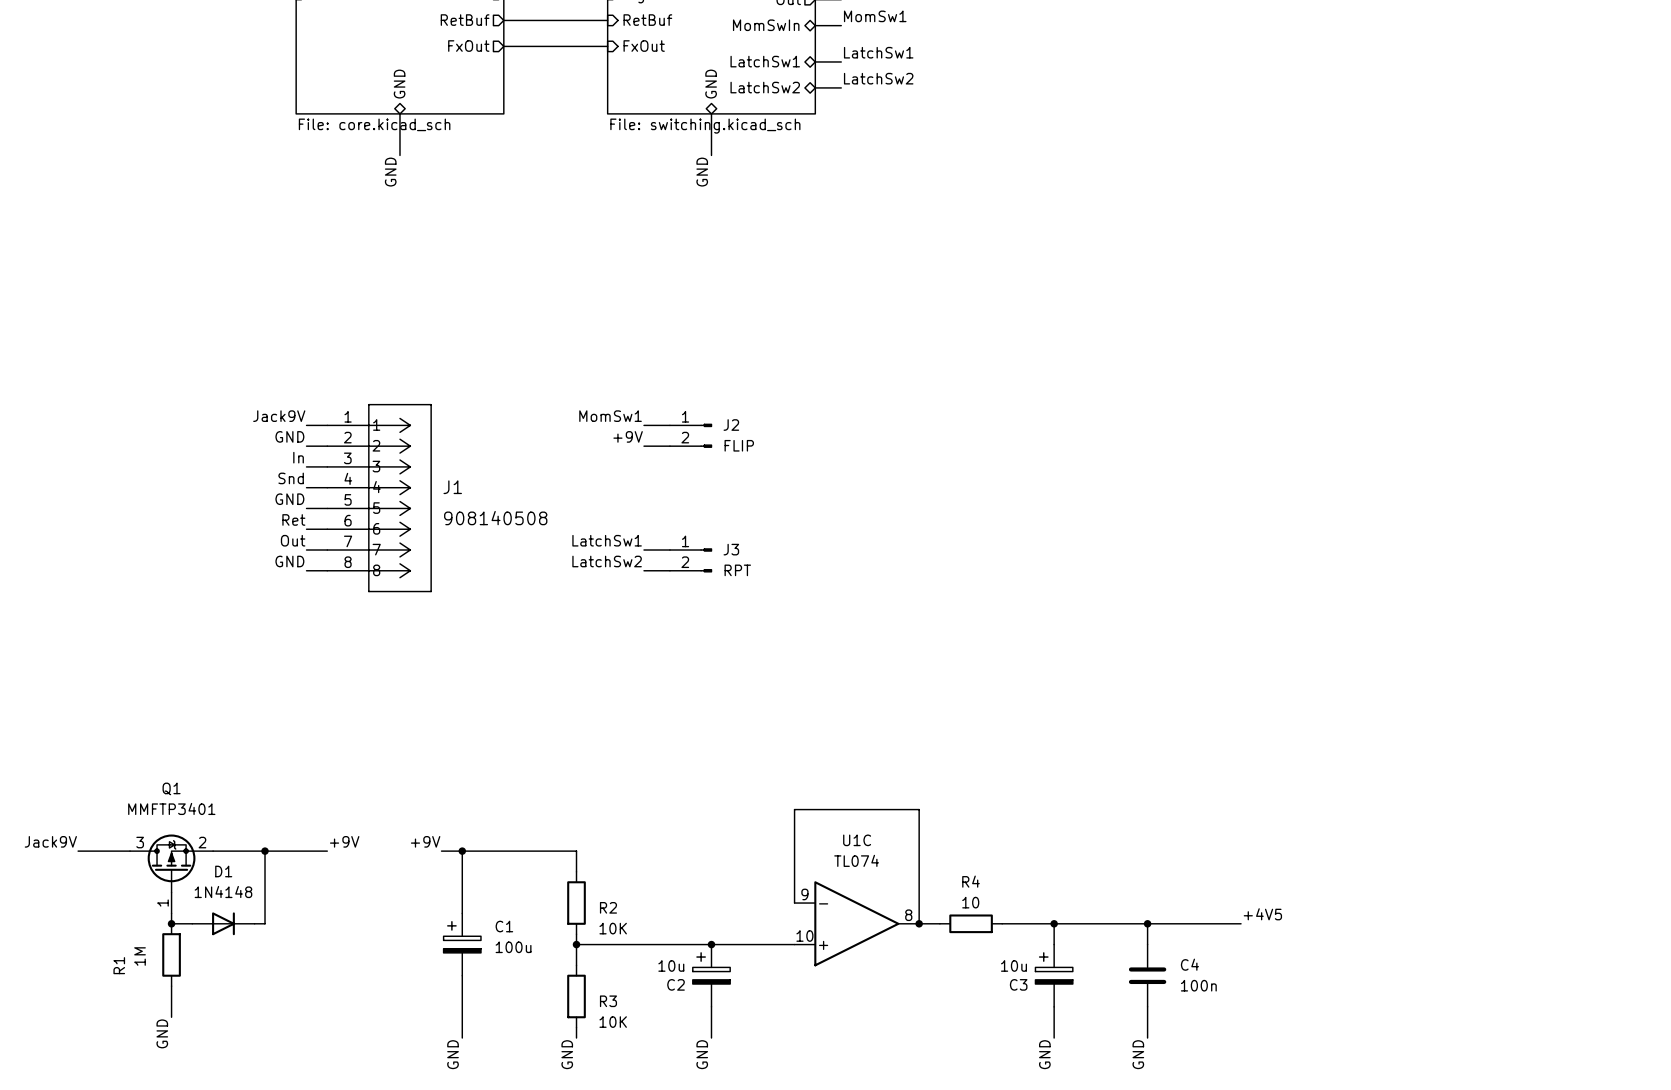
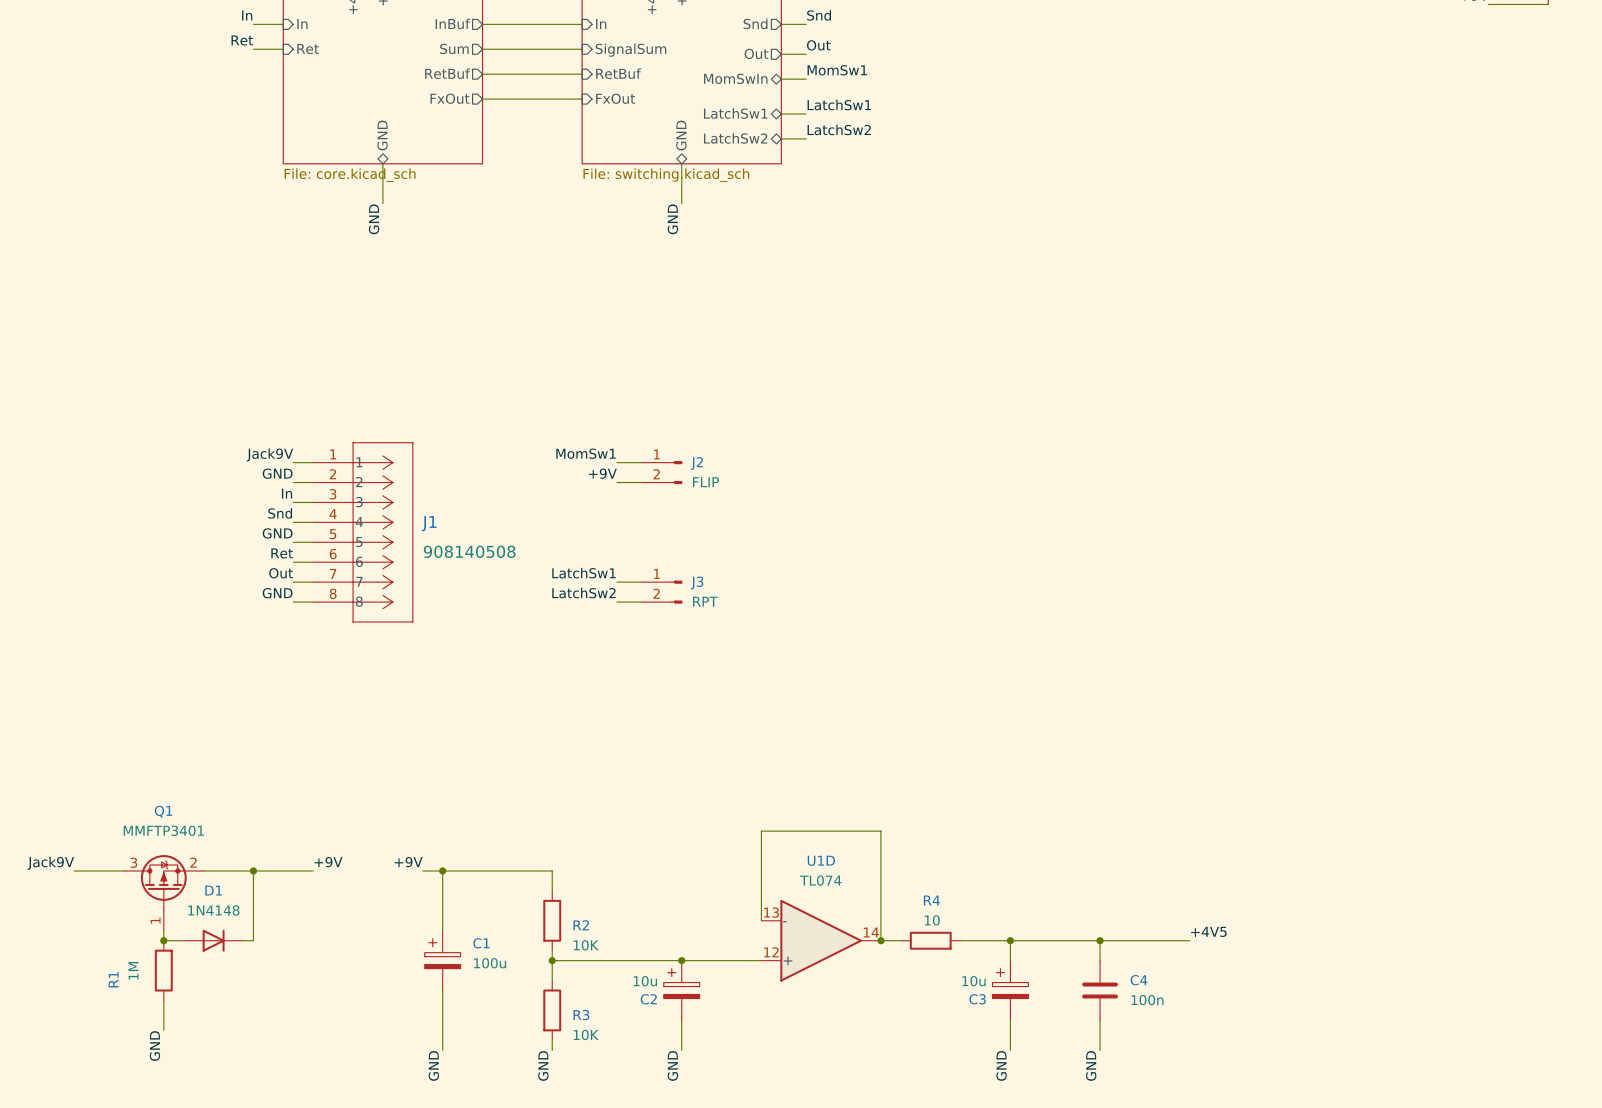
U1C name: U1C (857, 840) -> U1D (821, 860)
U1C pin number: 9 (804, 894) -> 13 (771, 912)
U1C pin number: 8 (908, 915) -> 14 (871, 932)
U1C pin number: 10 (804, 936) -> 12 (771, 952)

